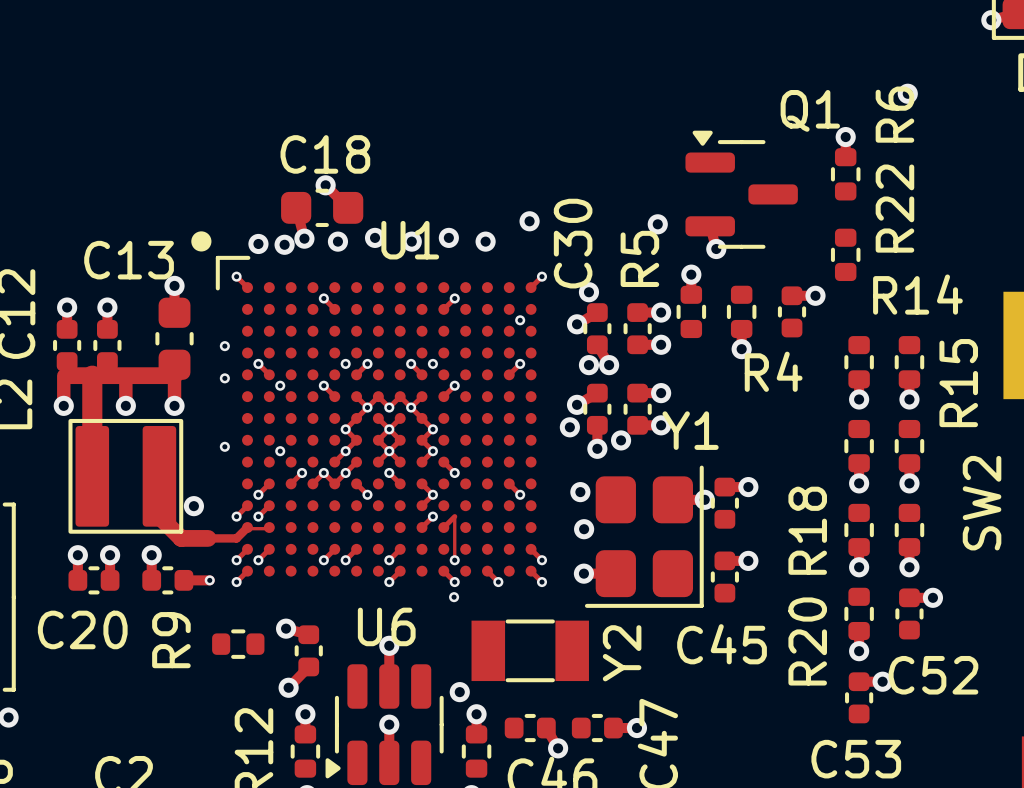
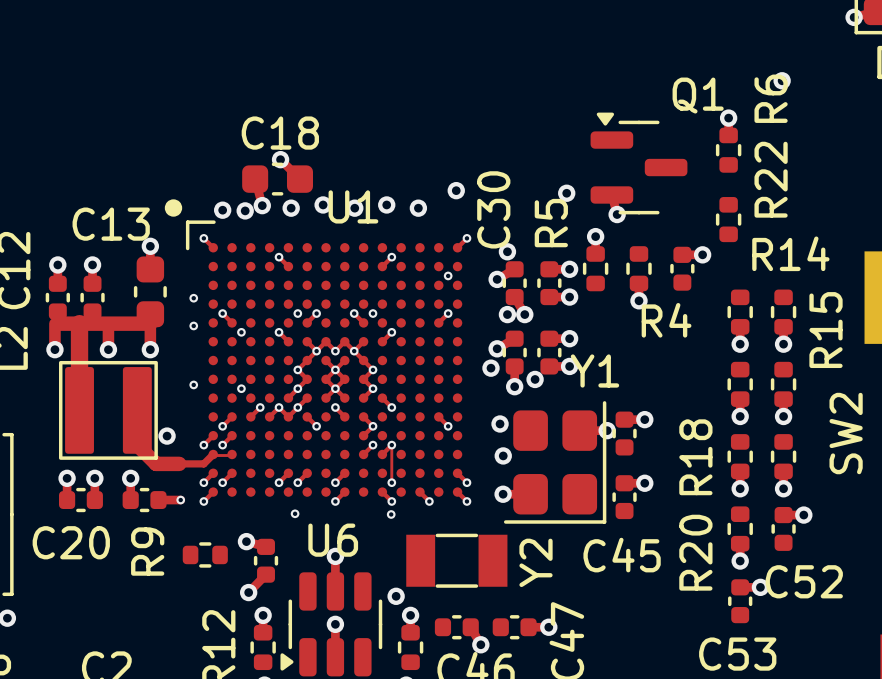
via: none -> (391, 445)
via: none -> (295, 513)

